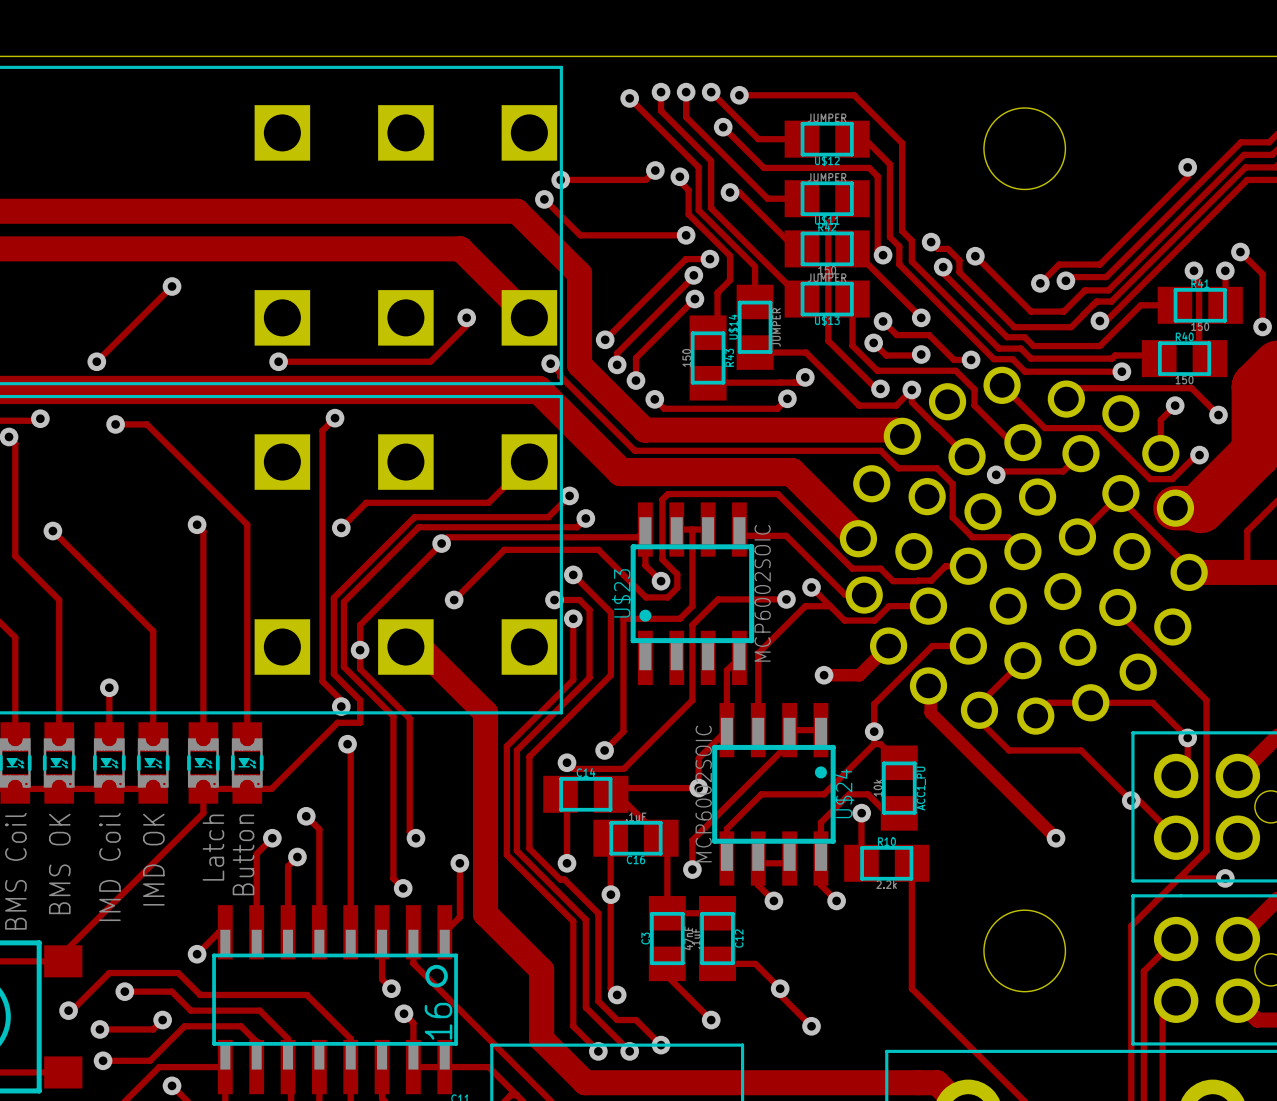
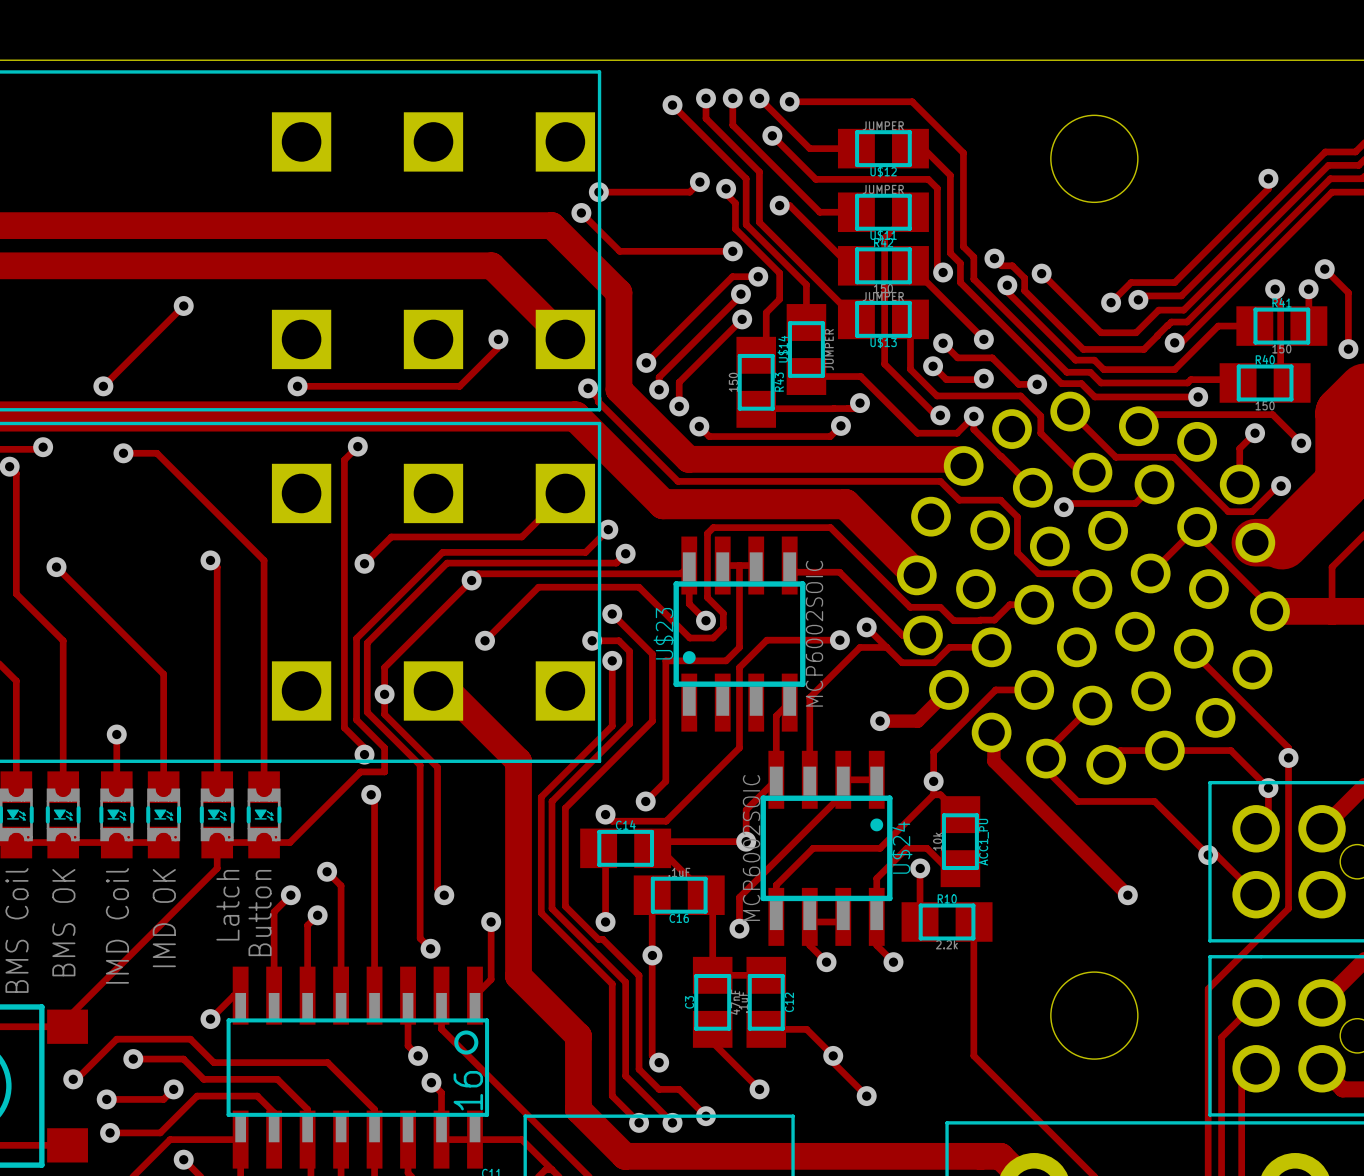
via: none -> (1288, 757)
track: (1178, 878) (1225, 878) -> none
via: (1225, 878) -> none

